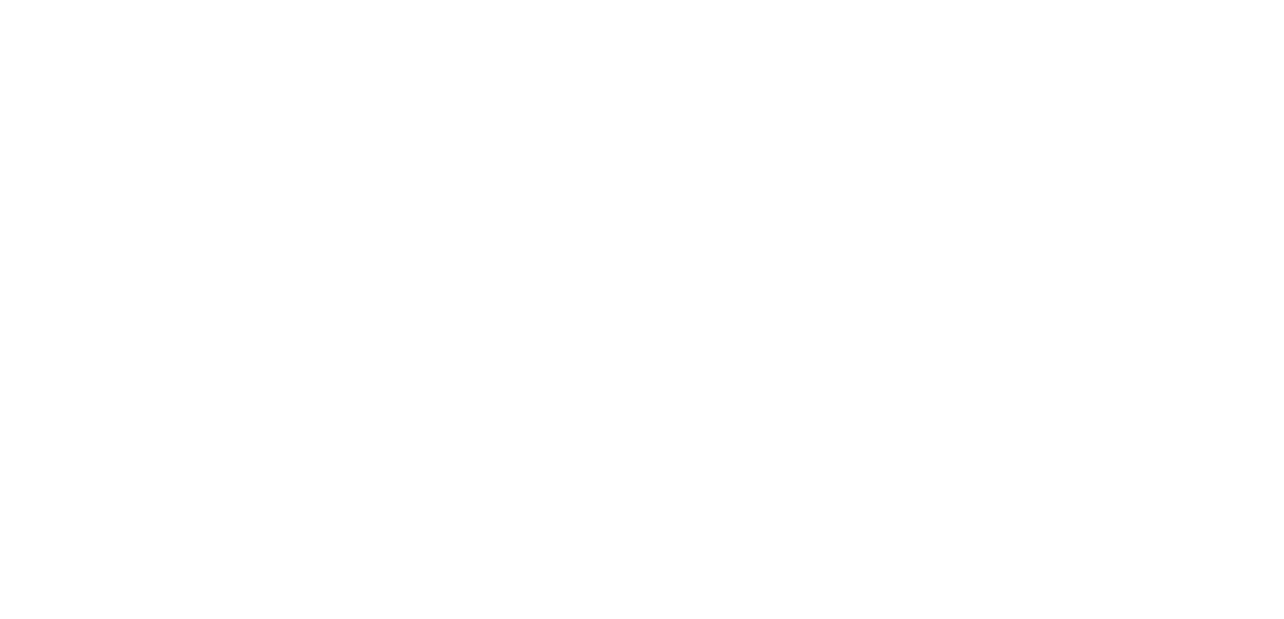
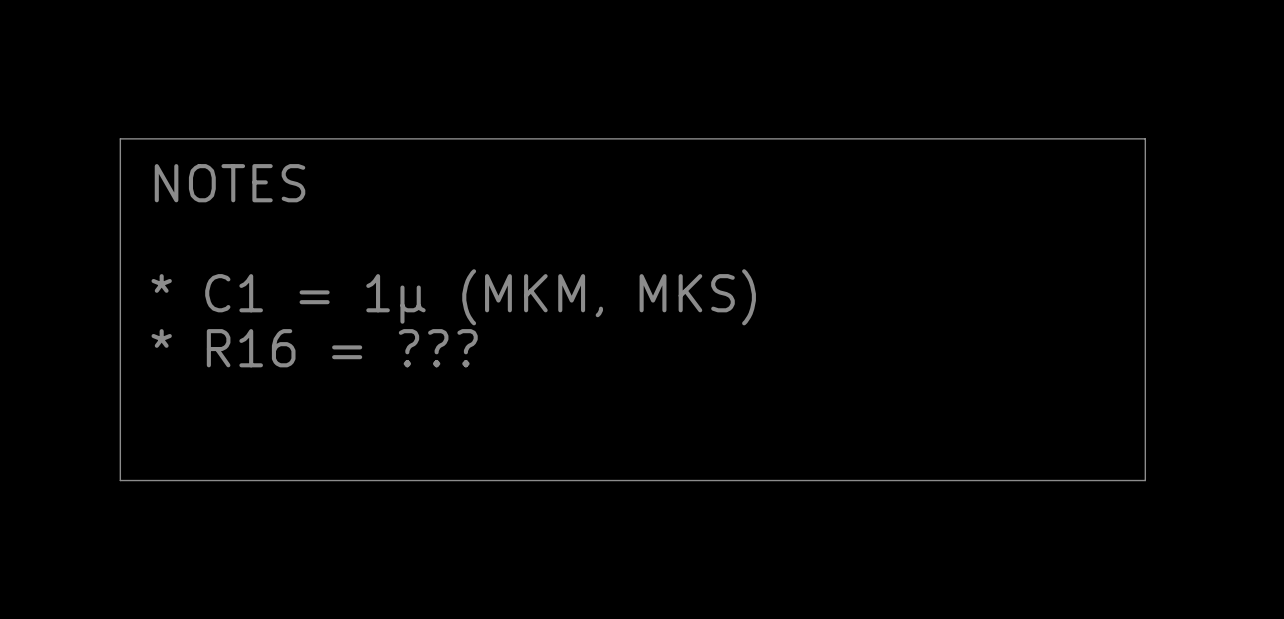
line: none -> (120, 138) (1145, 138) (1145, 480) (120, 480) (120, 138)
text: none -> NOTES (230, 183)
text: none -> * C1 = 1µ (MKM, MKS) (453, 297)
text: none -> * R16 = ??? (314, 348)

